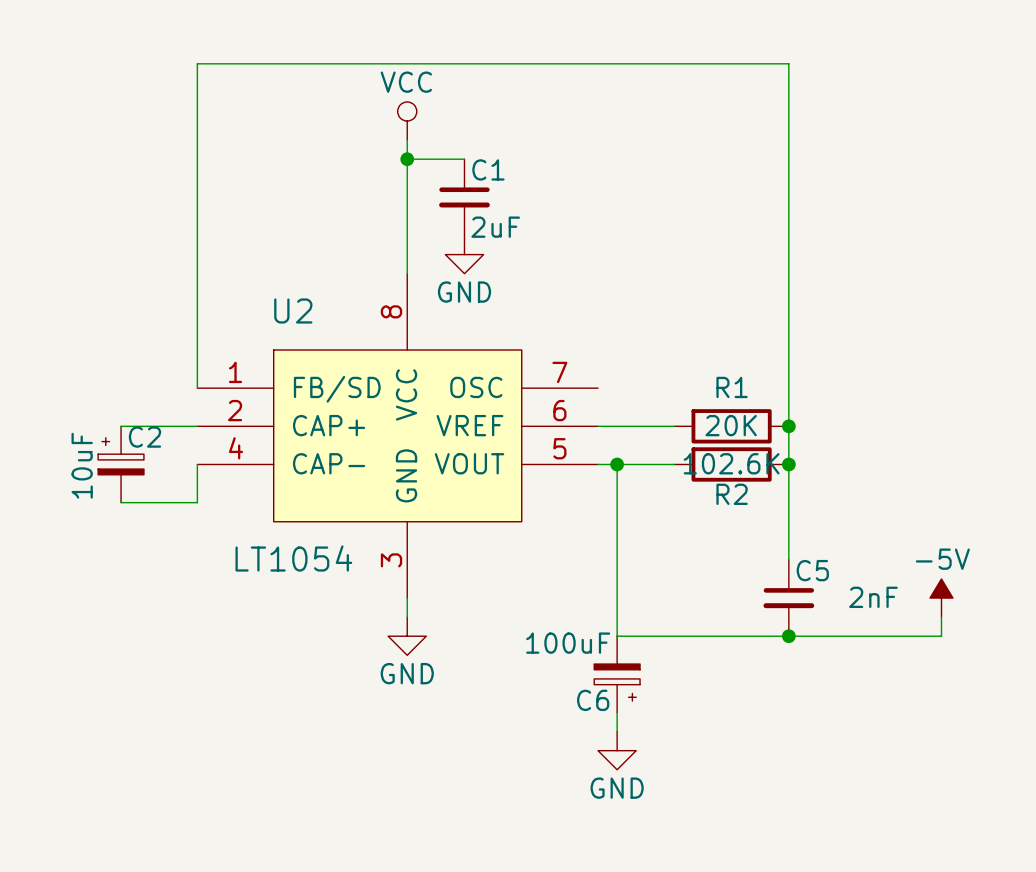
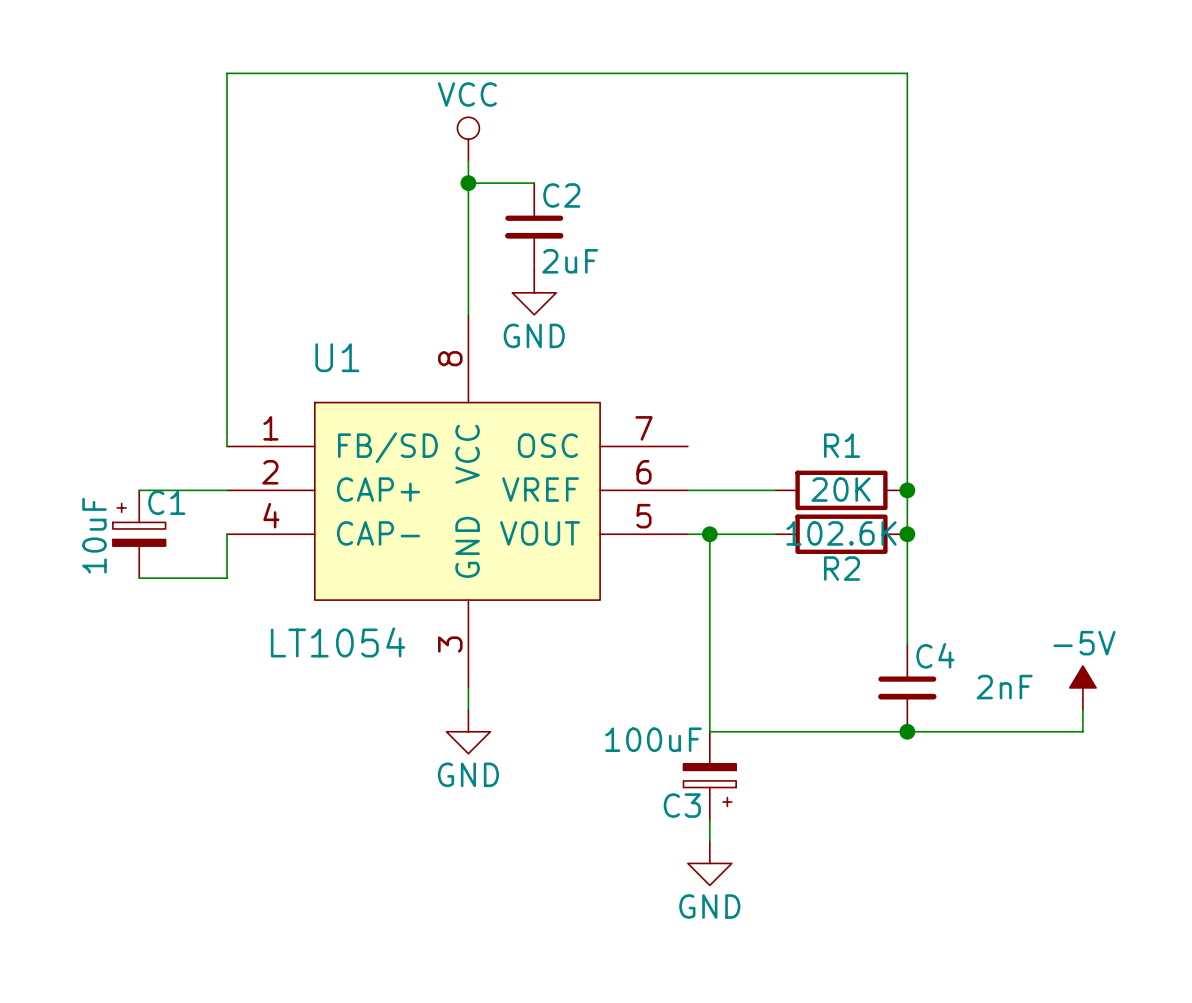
C1 name: C1 (488, 169) -> C2 (561, 195)
U2 name: U2 (293, 310) -> U1 (337, 357)
C2 name: C2 (144, 437) -> C1 (166, 502)
C5 name: C5 (812, 570) -> C4 (935, 655)
C6 name: C6 (593, 700) -> C3 (682, 805)

